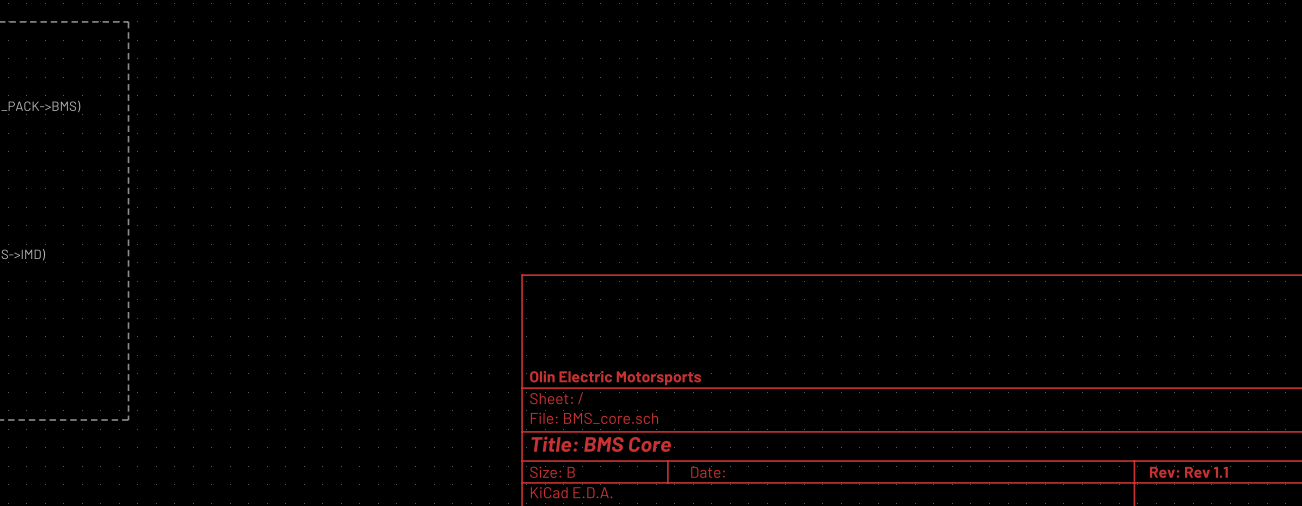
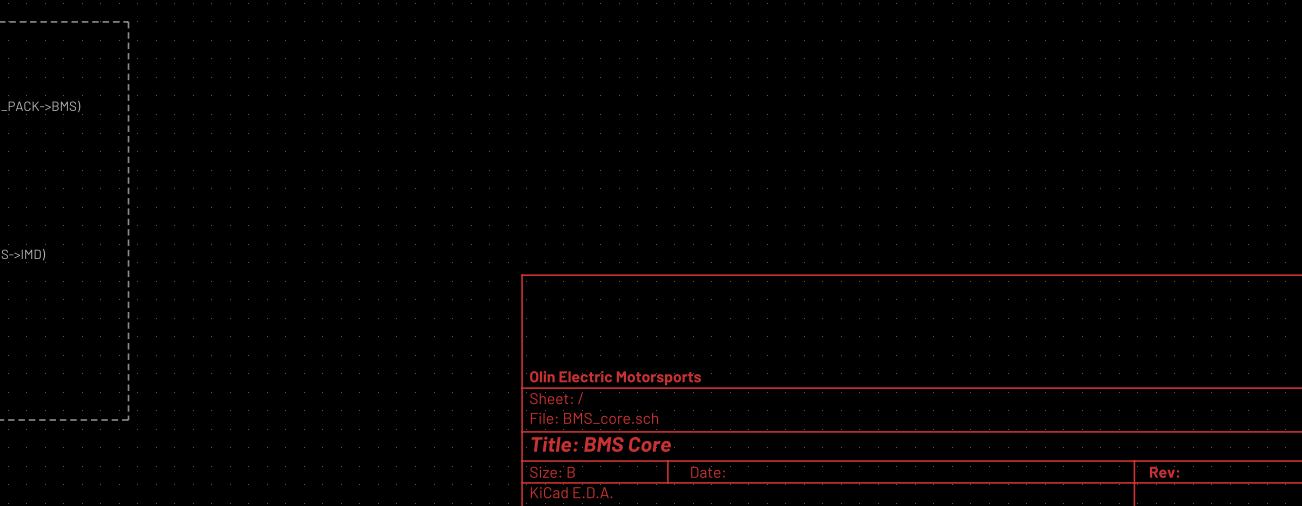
title block: Rev: Rev 1.1 (1188, 472) -> Rev: (1164, 472)

